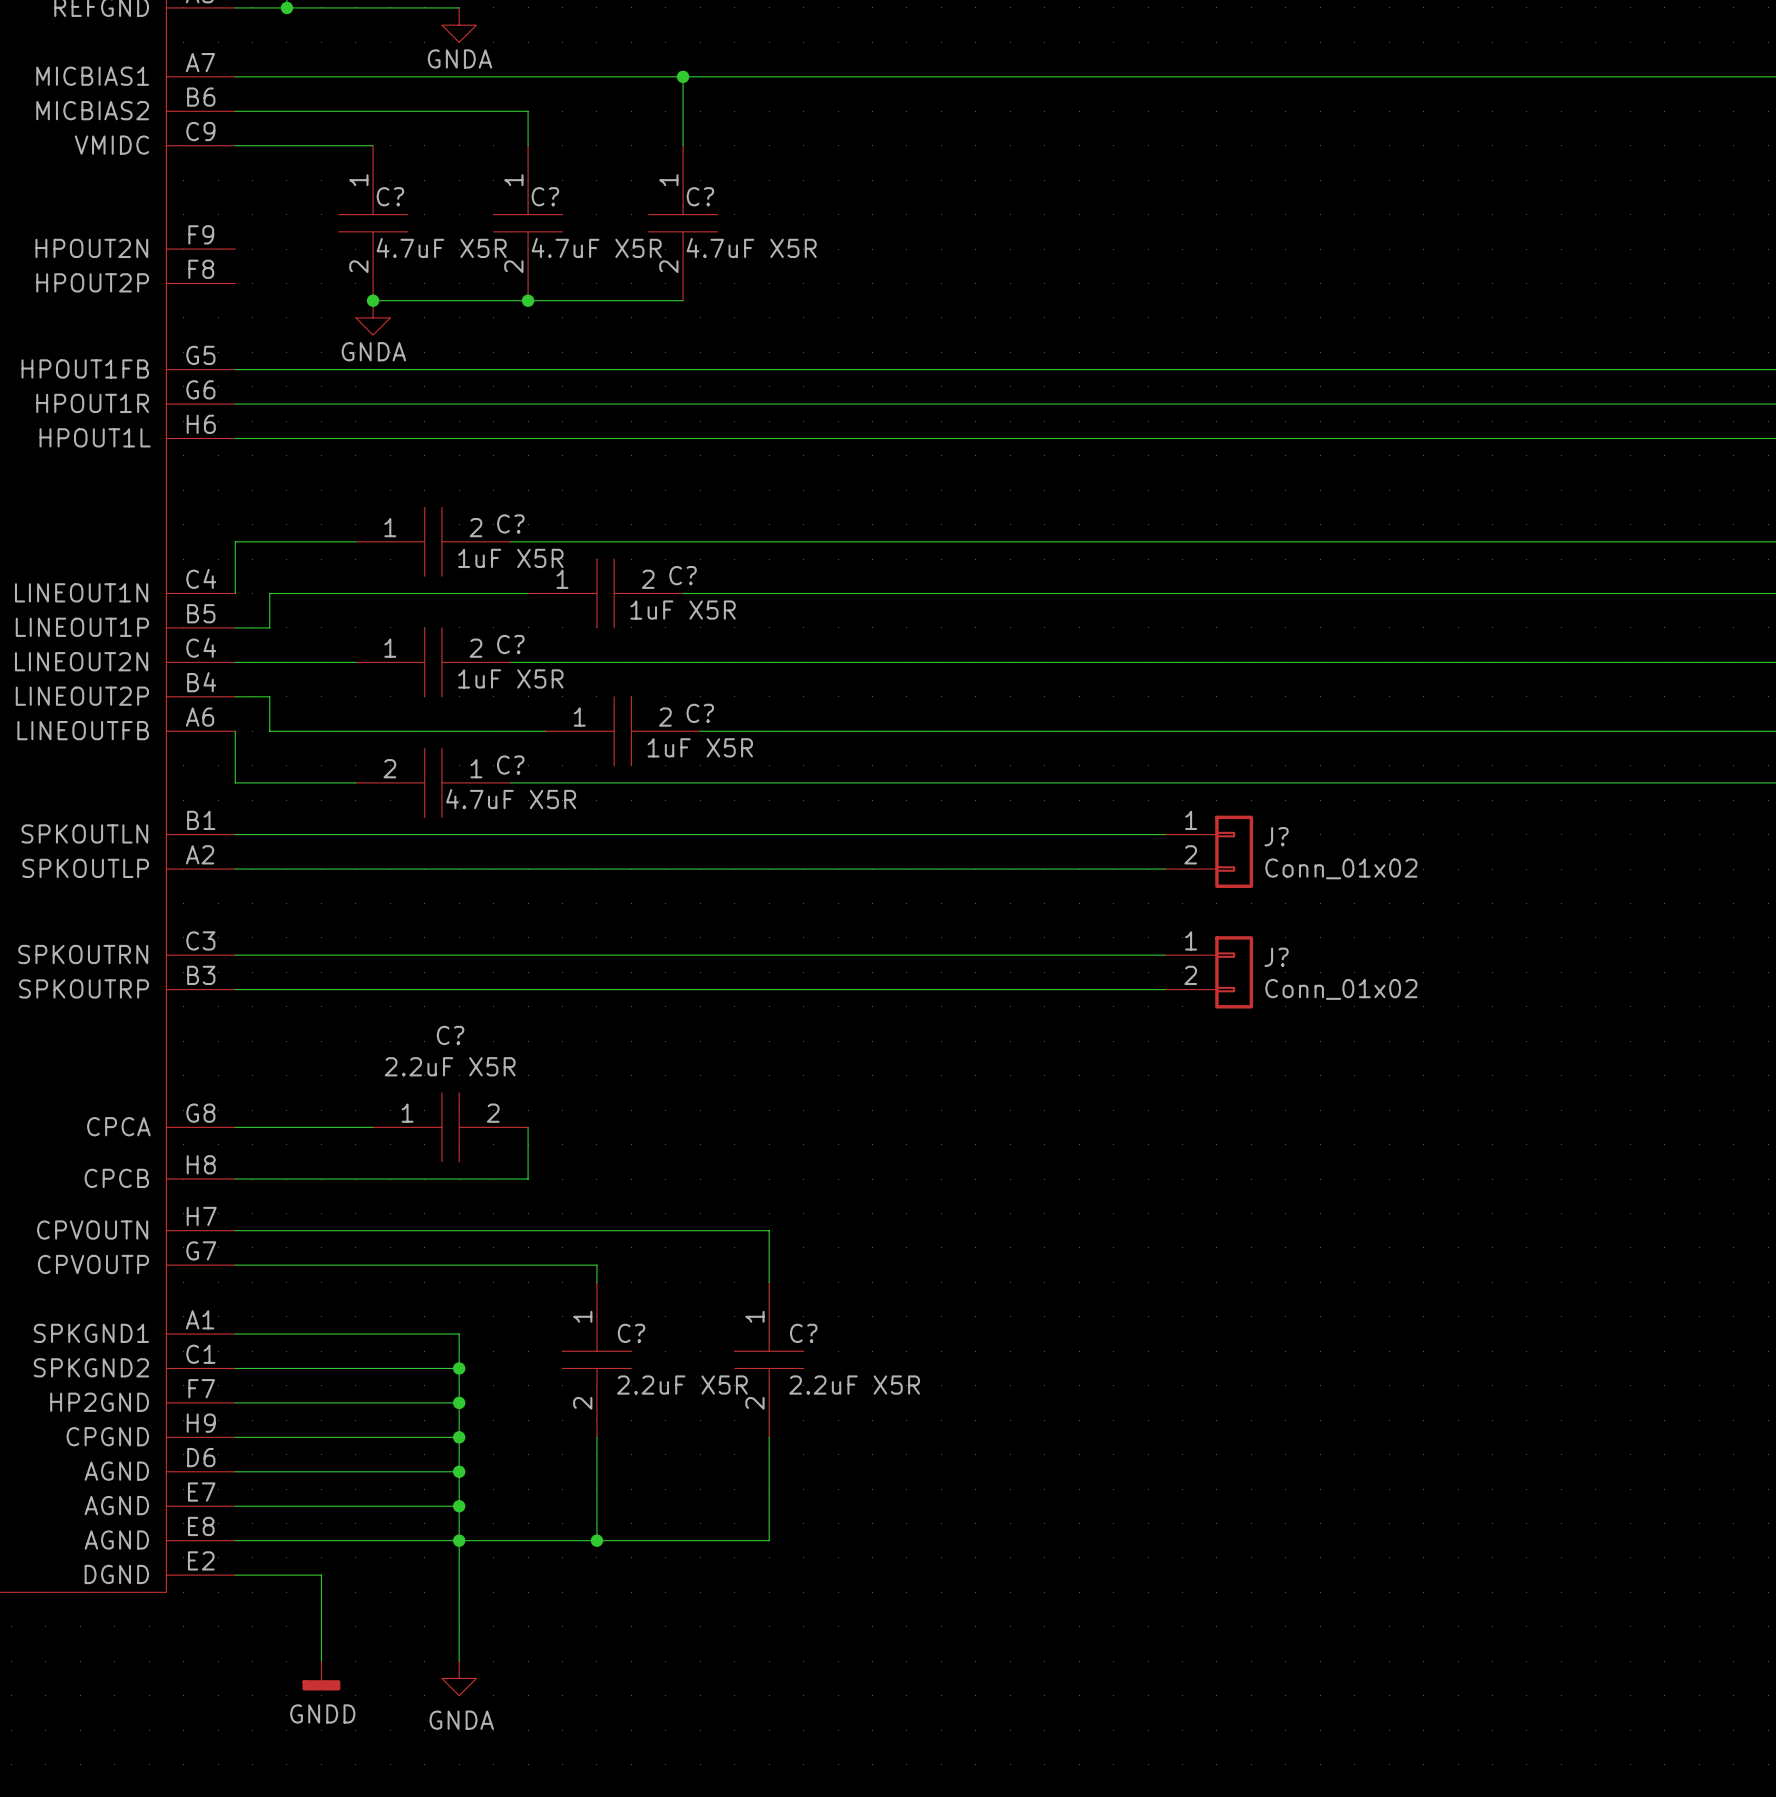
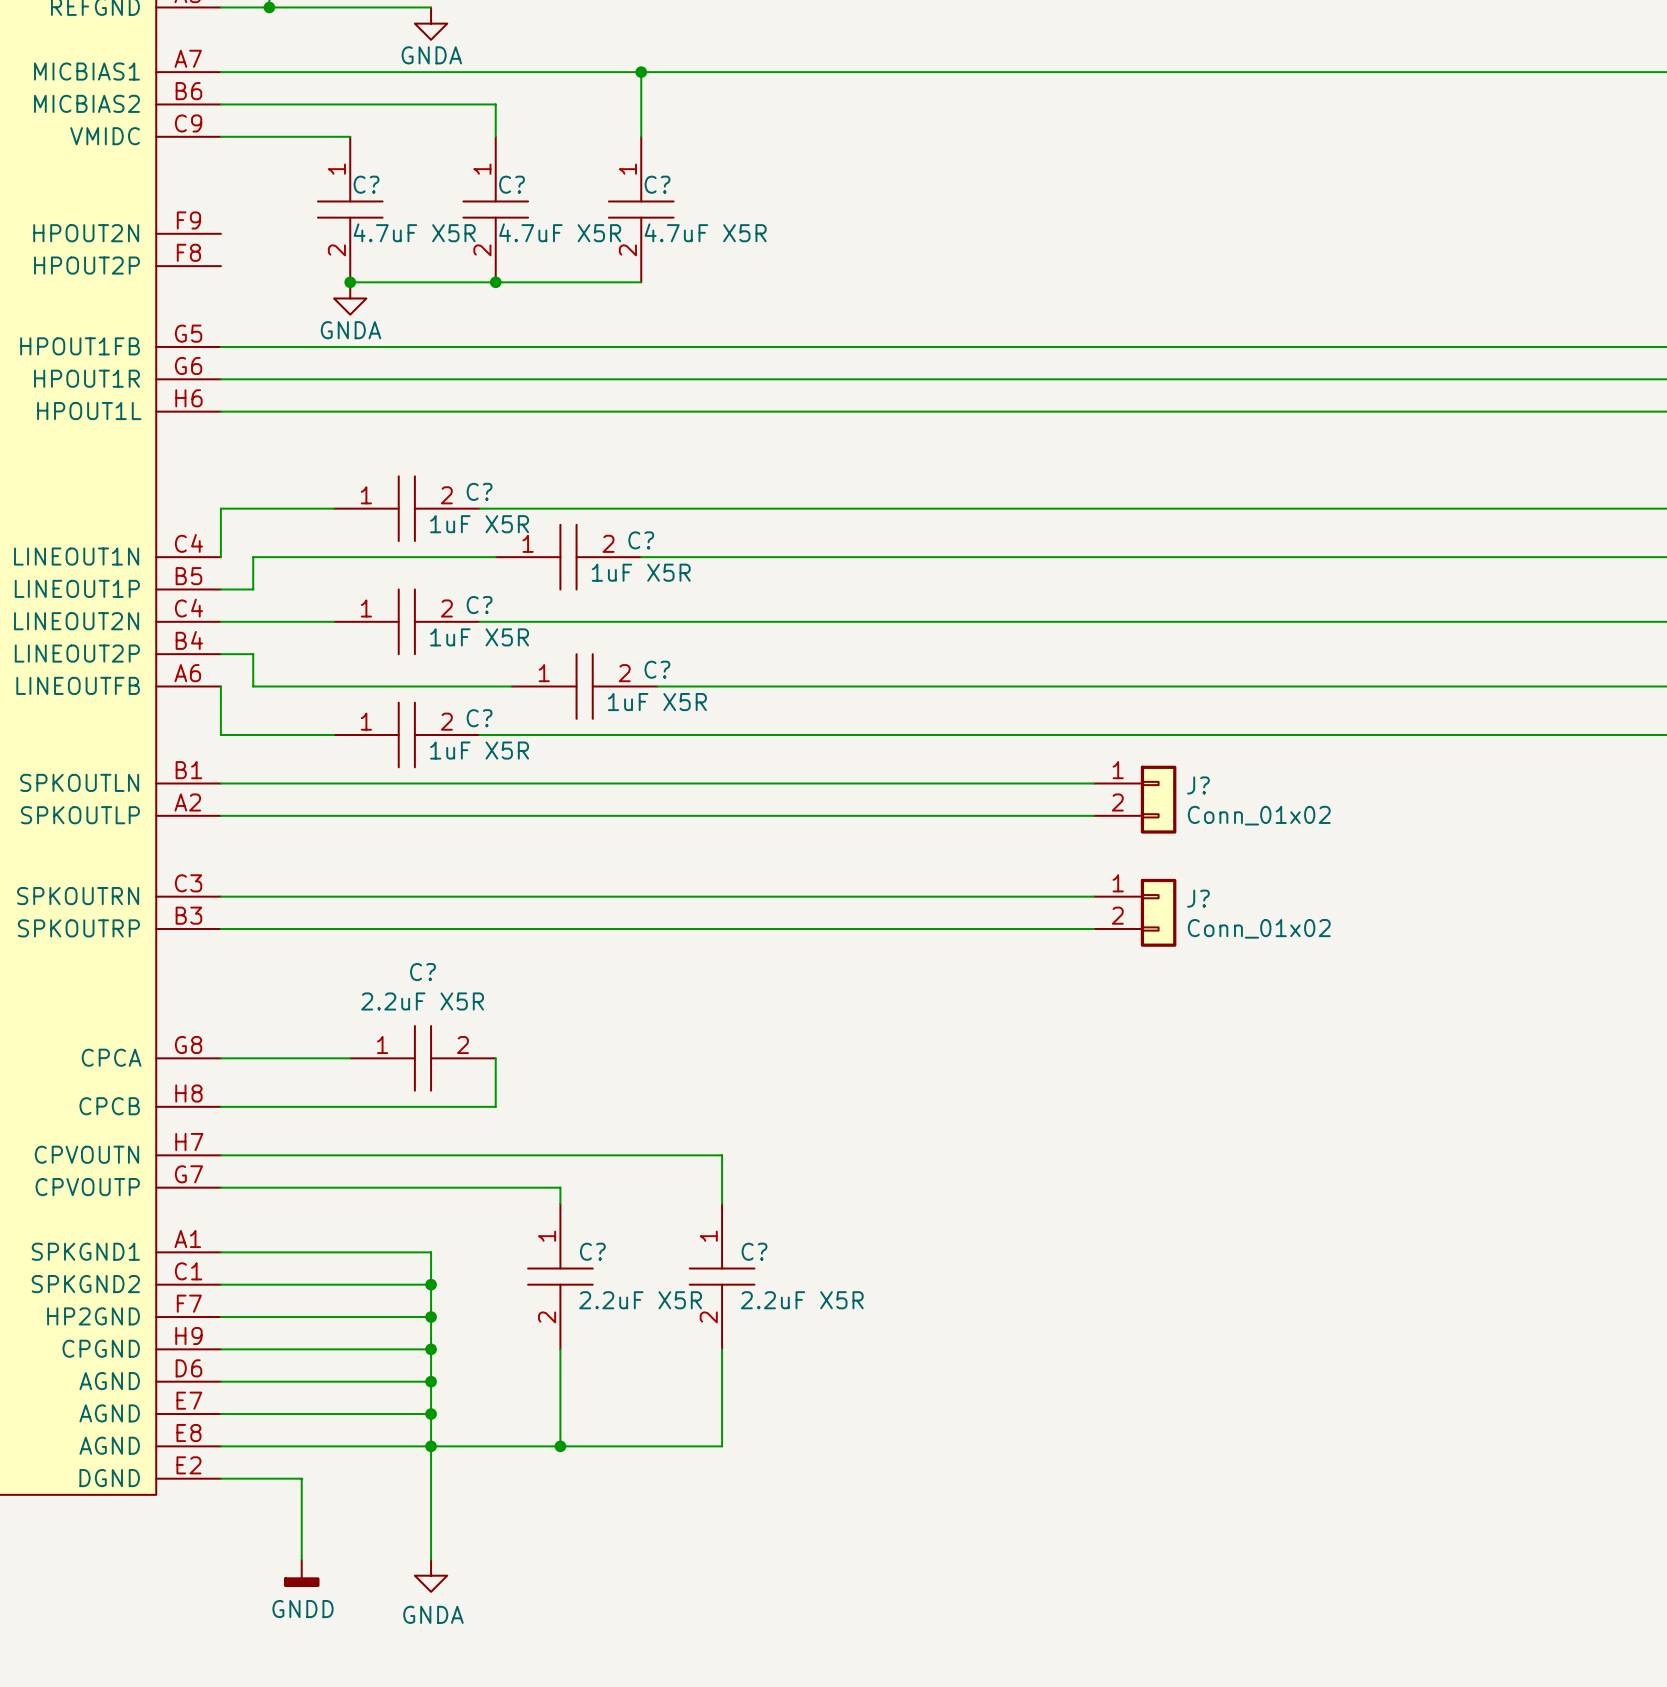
C? rotation: 0° (433, 782) -> 180° (406, 734)
C? text: 4.7uF X5R (511, 799) -> 1uF X5R (479, 750)

